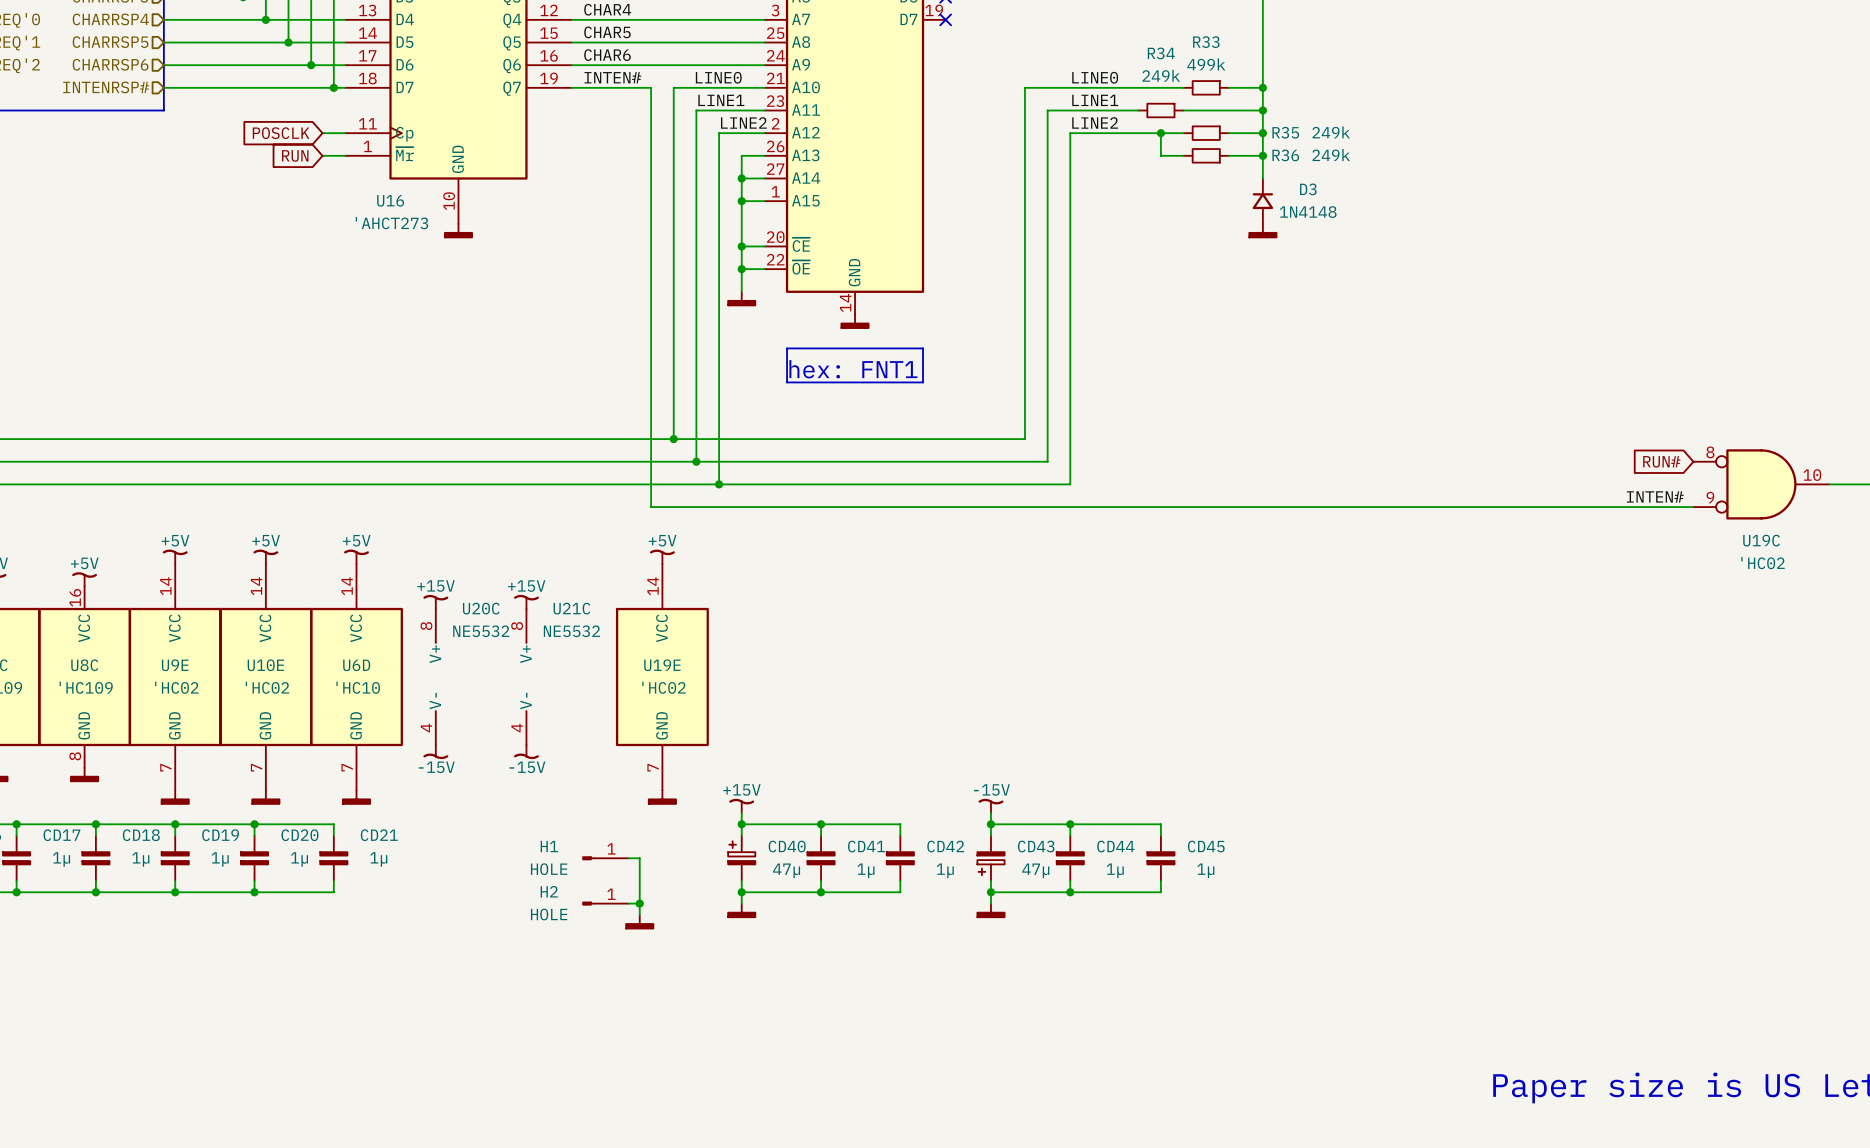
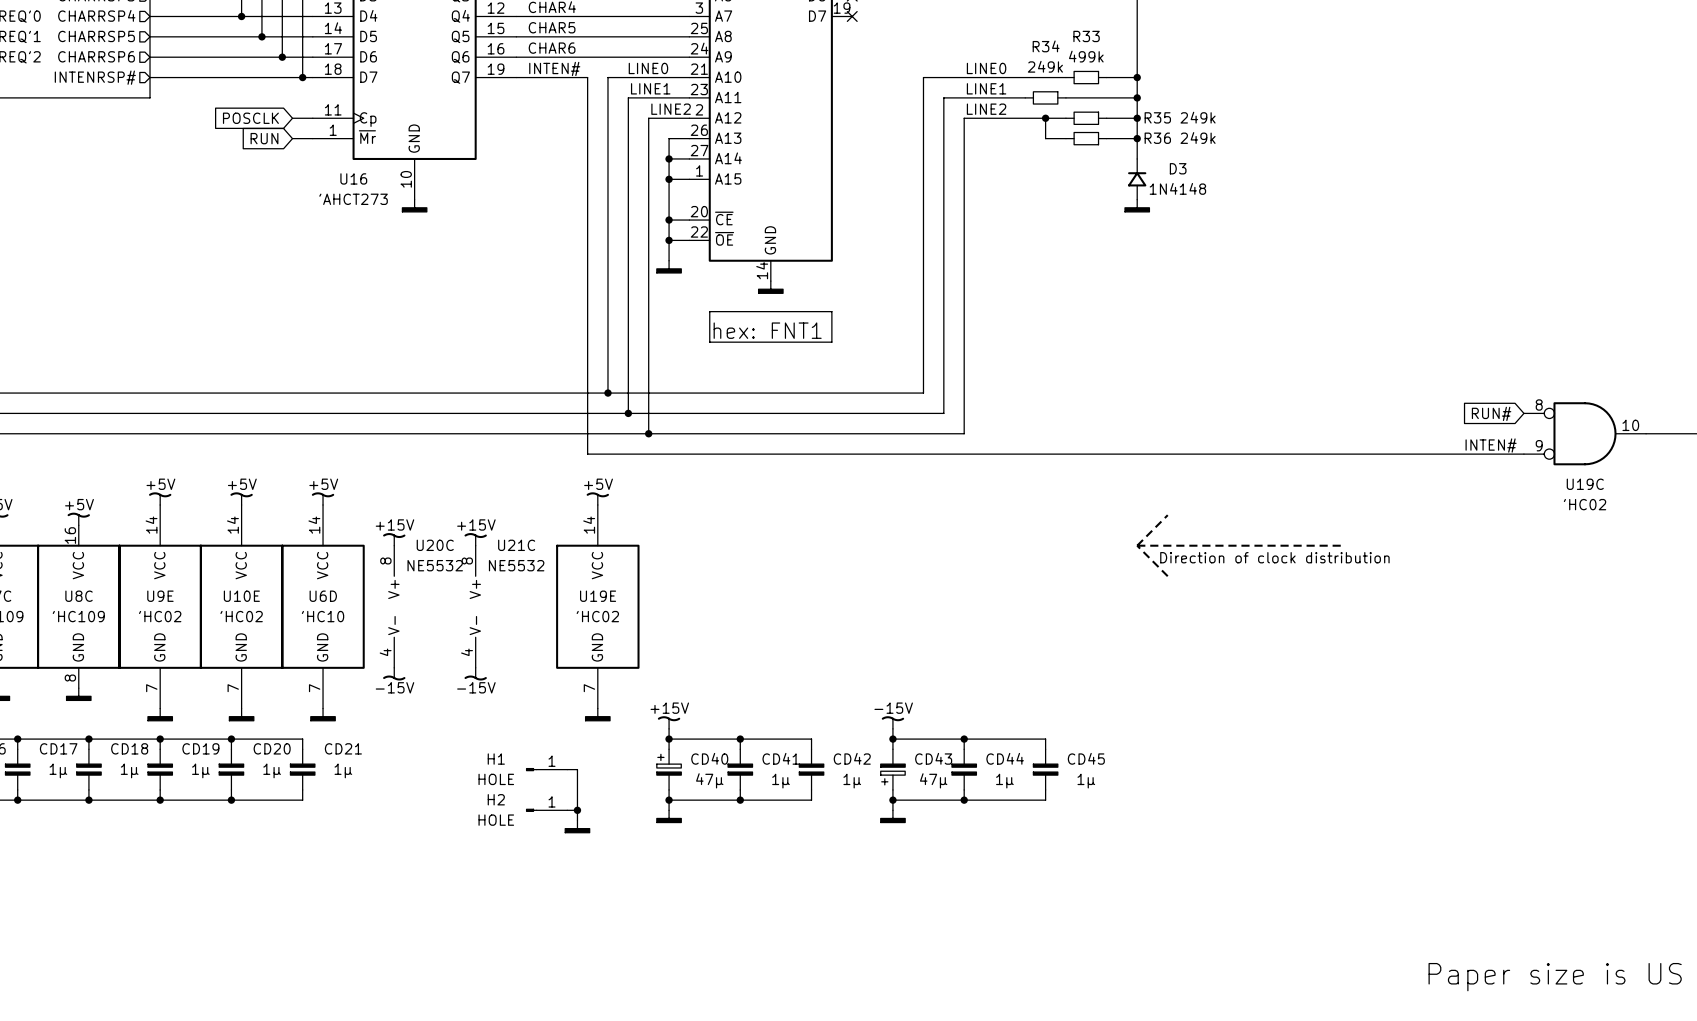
line: none -> (1167, 515) (1137, 545)
line: none -> (1137, 545) (1340, 545)
line: none -> (1137, 545) (1167, 576)
text: none -> Direction of clock distribution (1274, 557)

